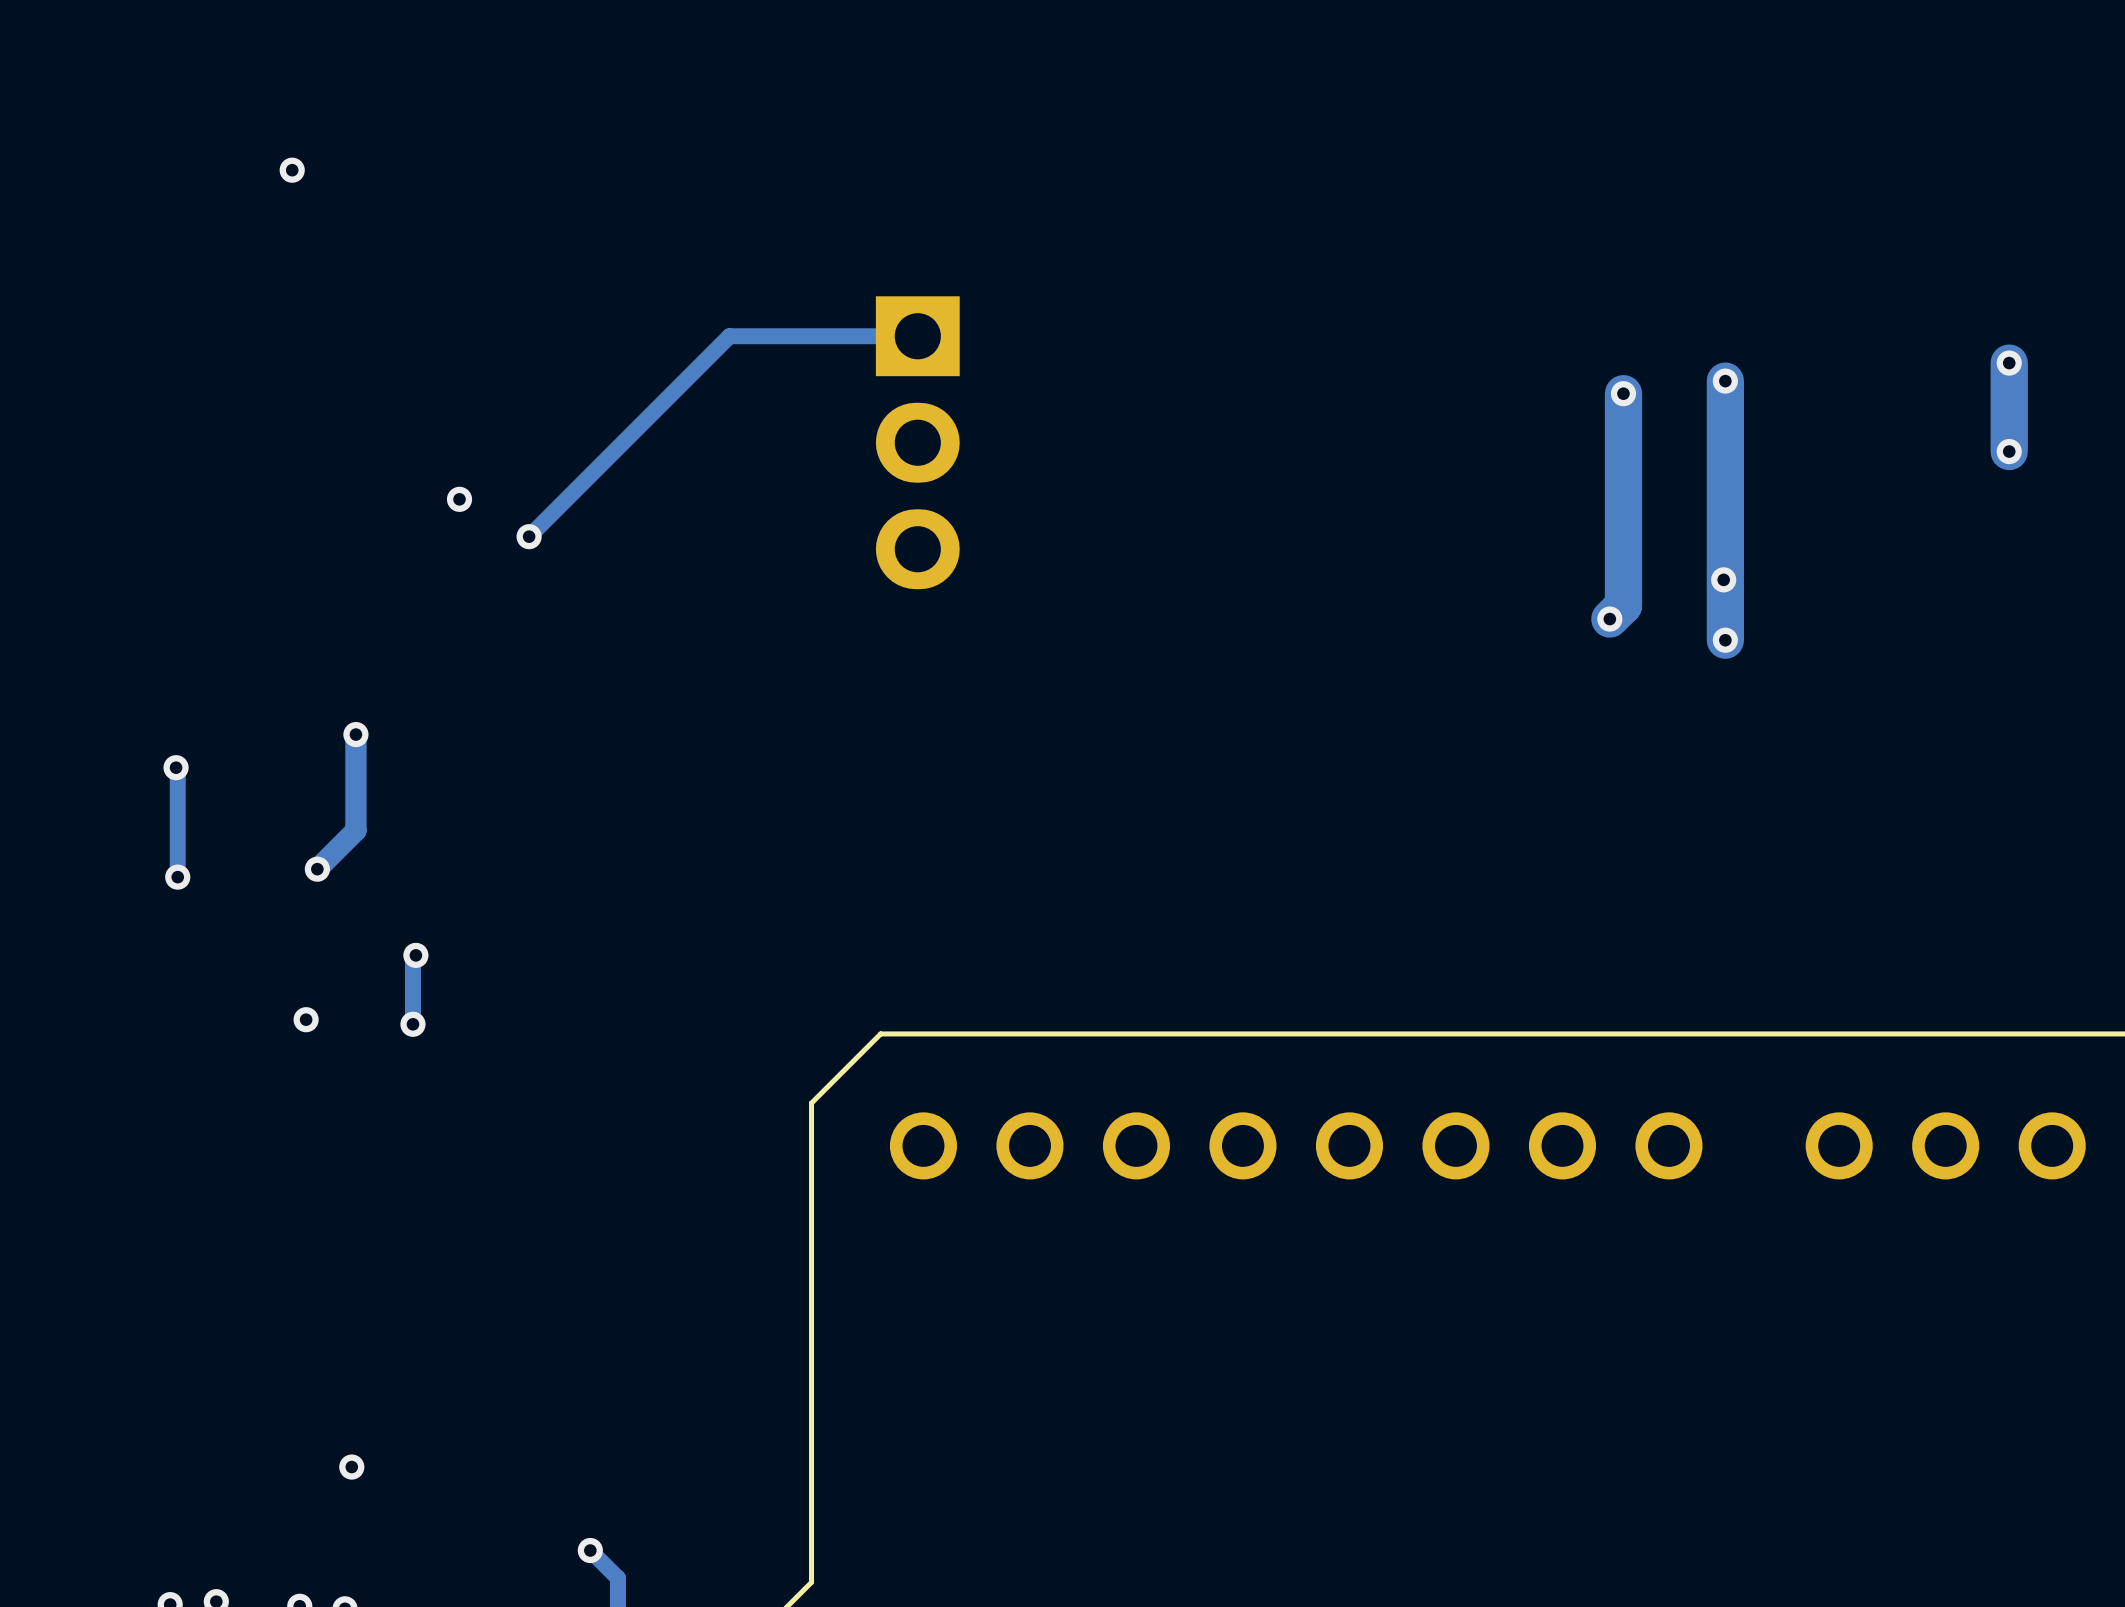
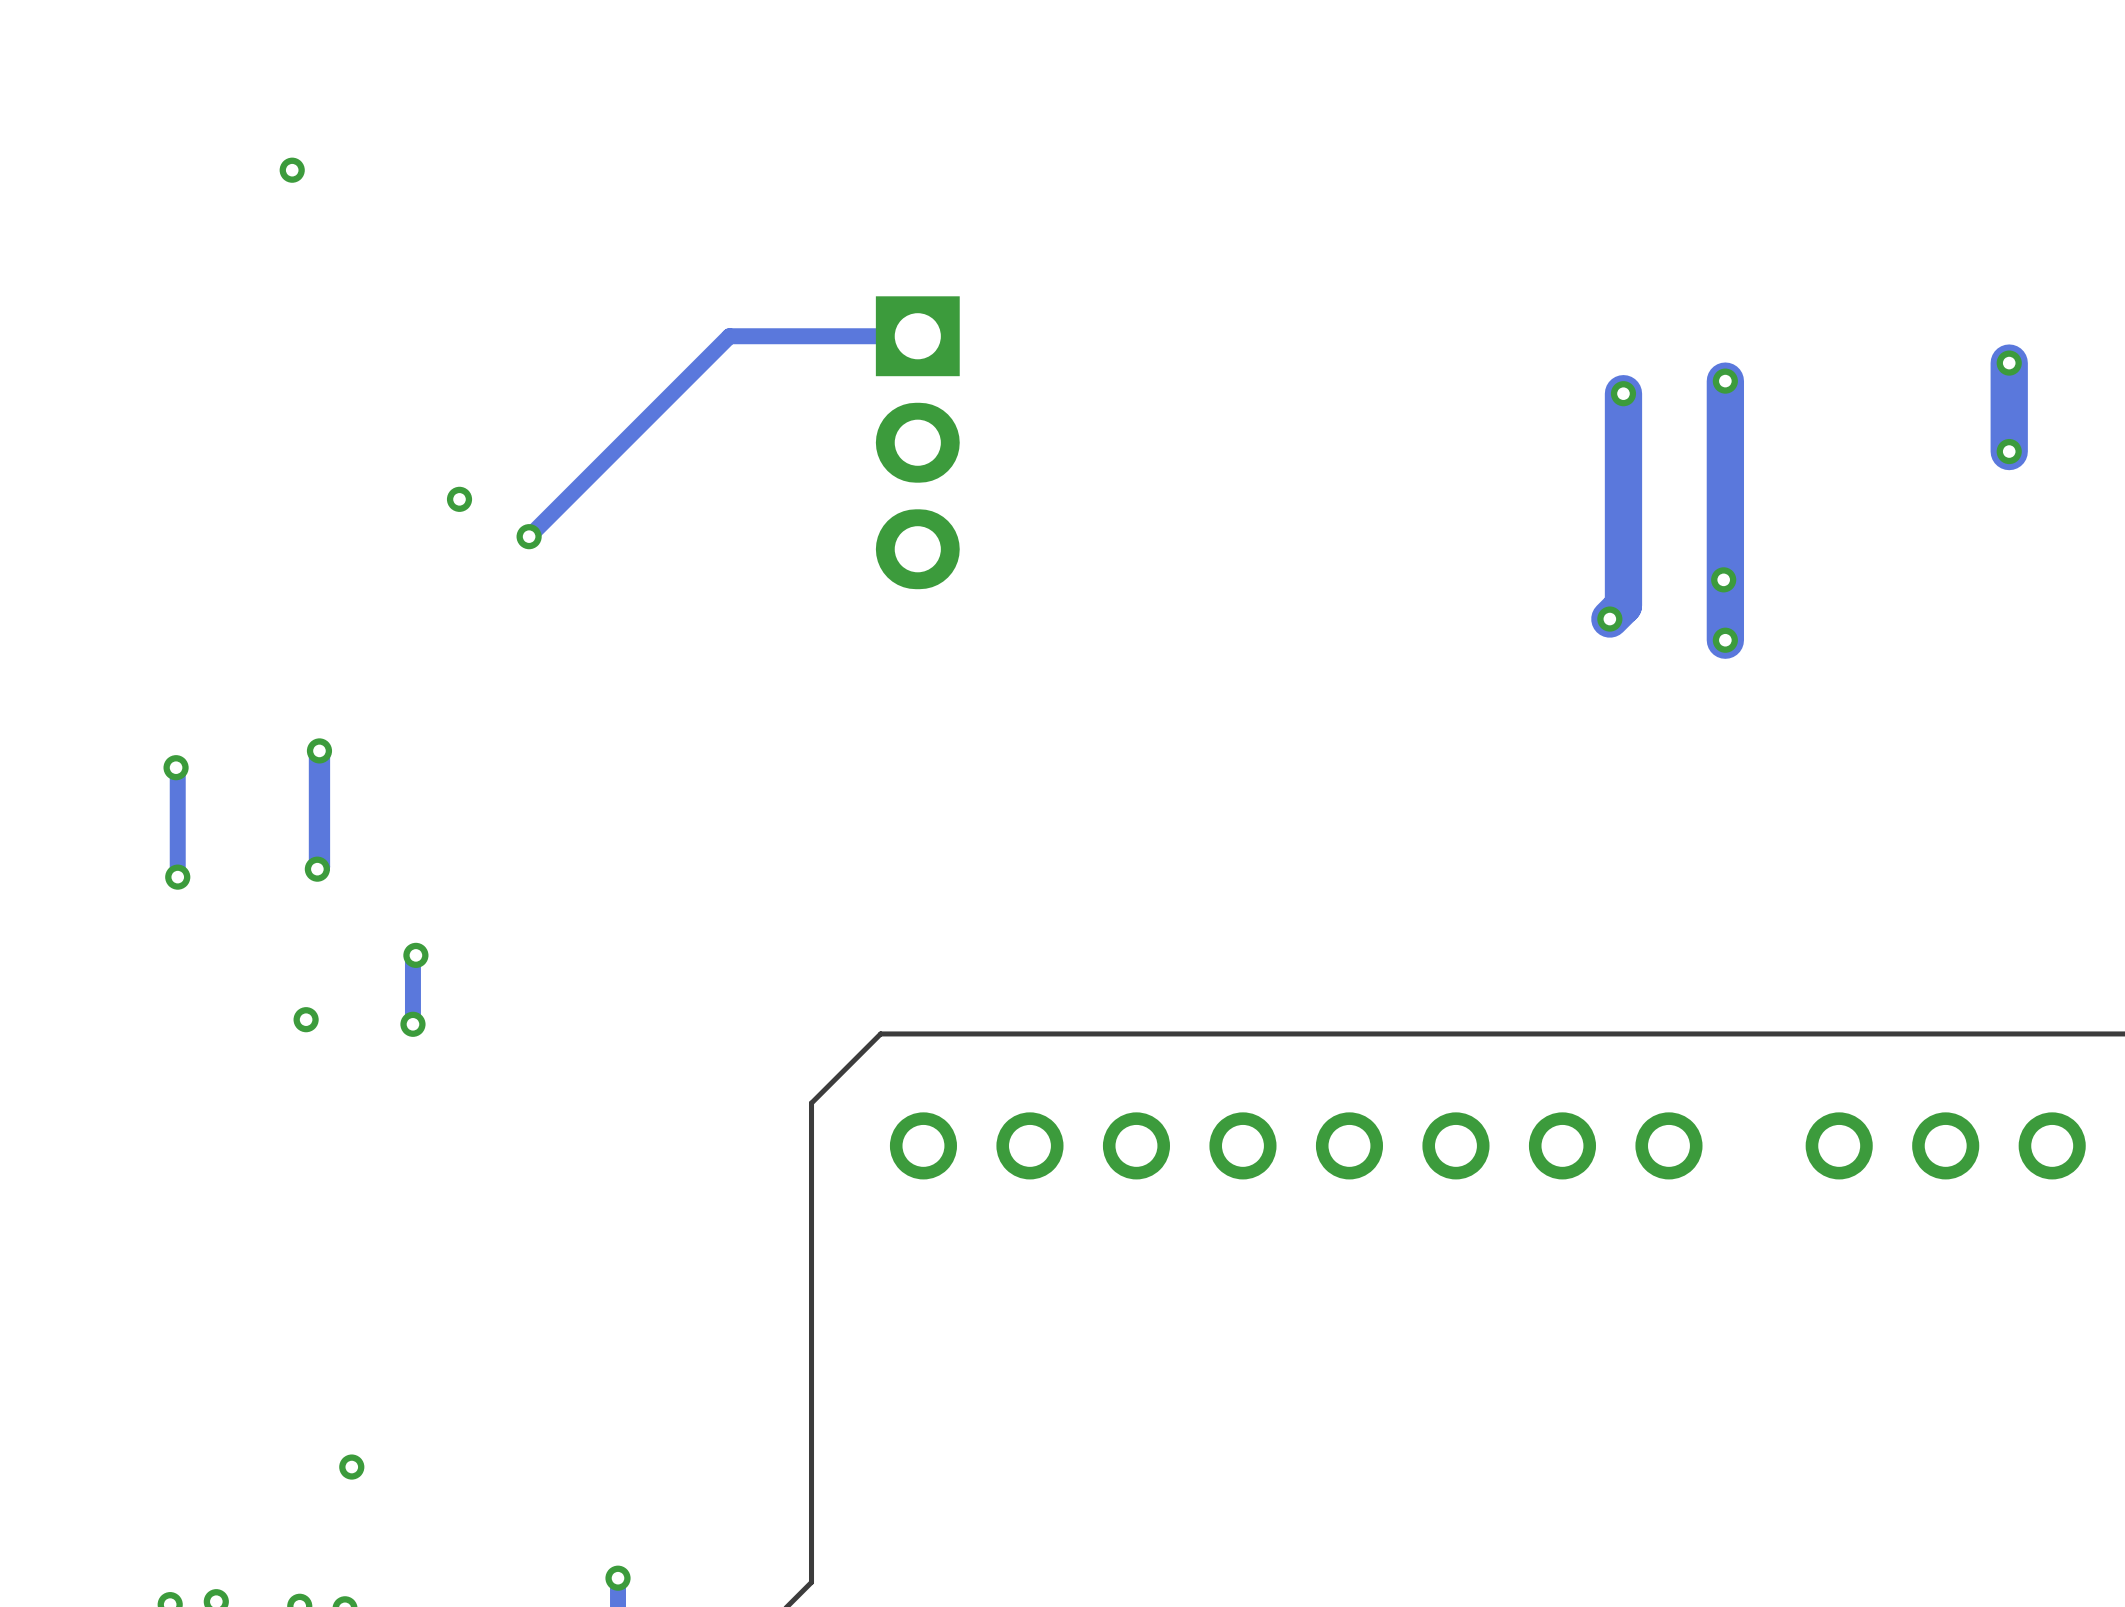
track: (355, 734) (355, 830) (319, 867) -> (319, 750) (319, 867)
via position: (355, 734) -> (319, 750)
track: (590, 1550) (618, 1578) -> none
via position: (590, 1550) -> (618, 1578)

